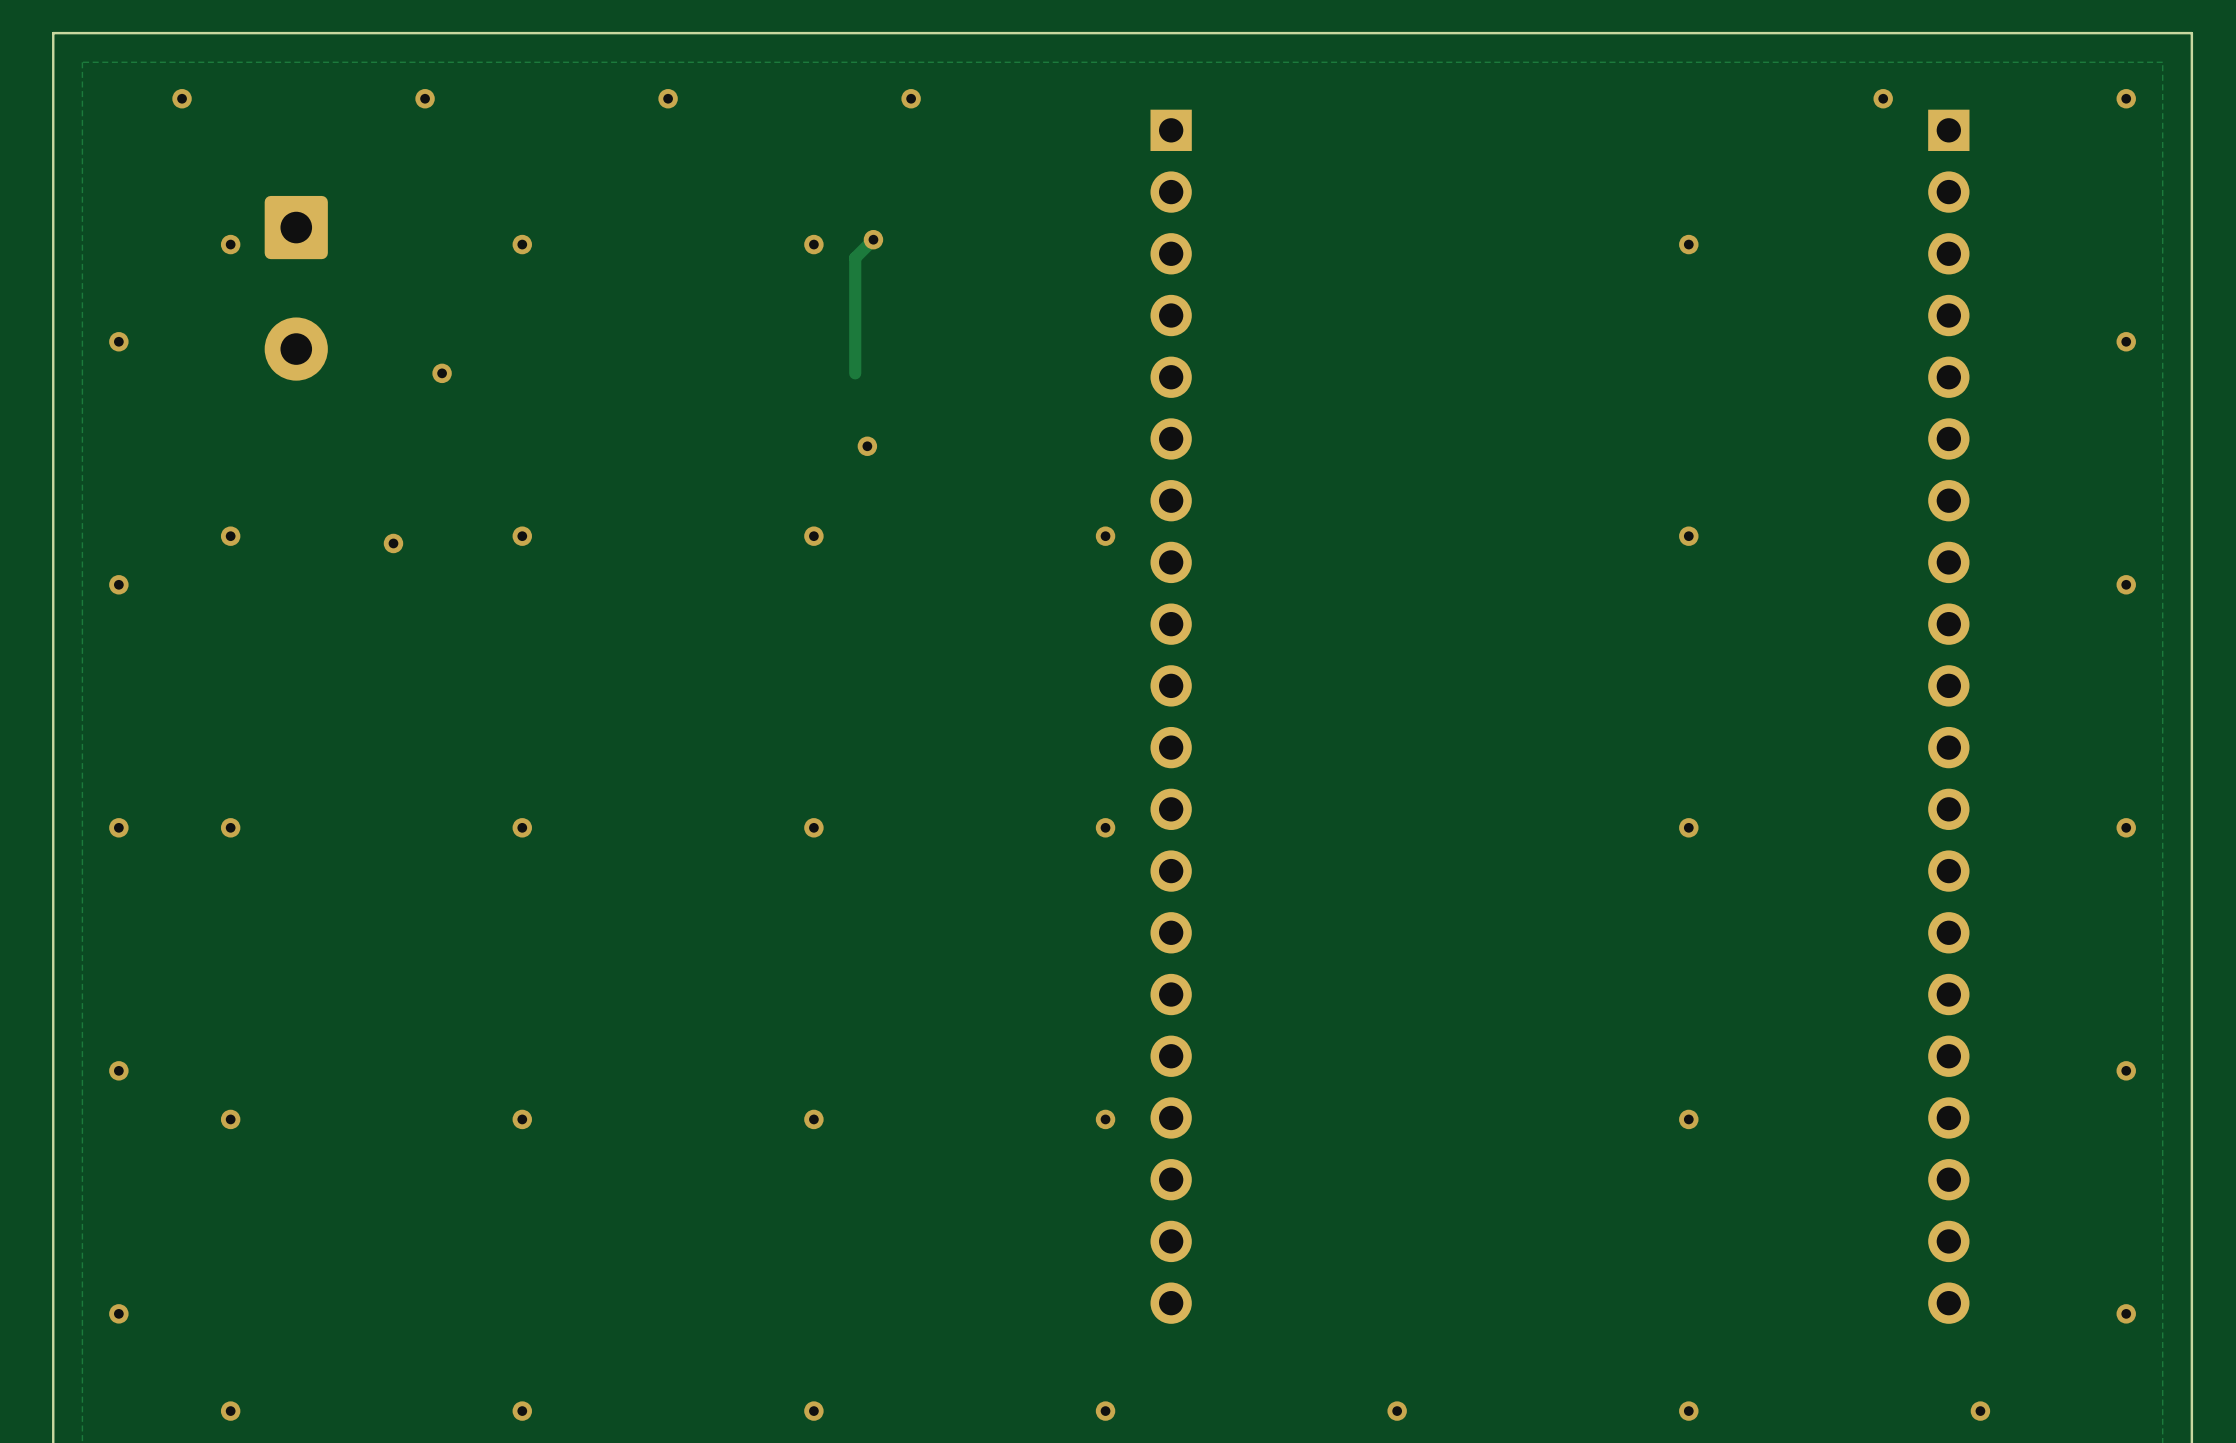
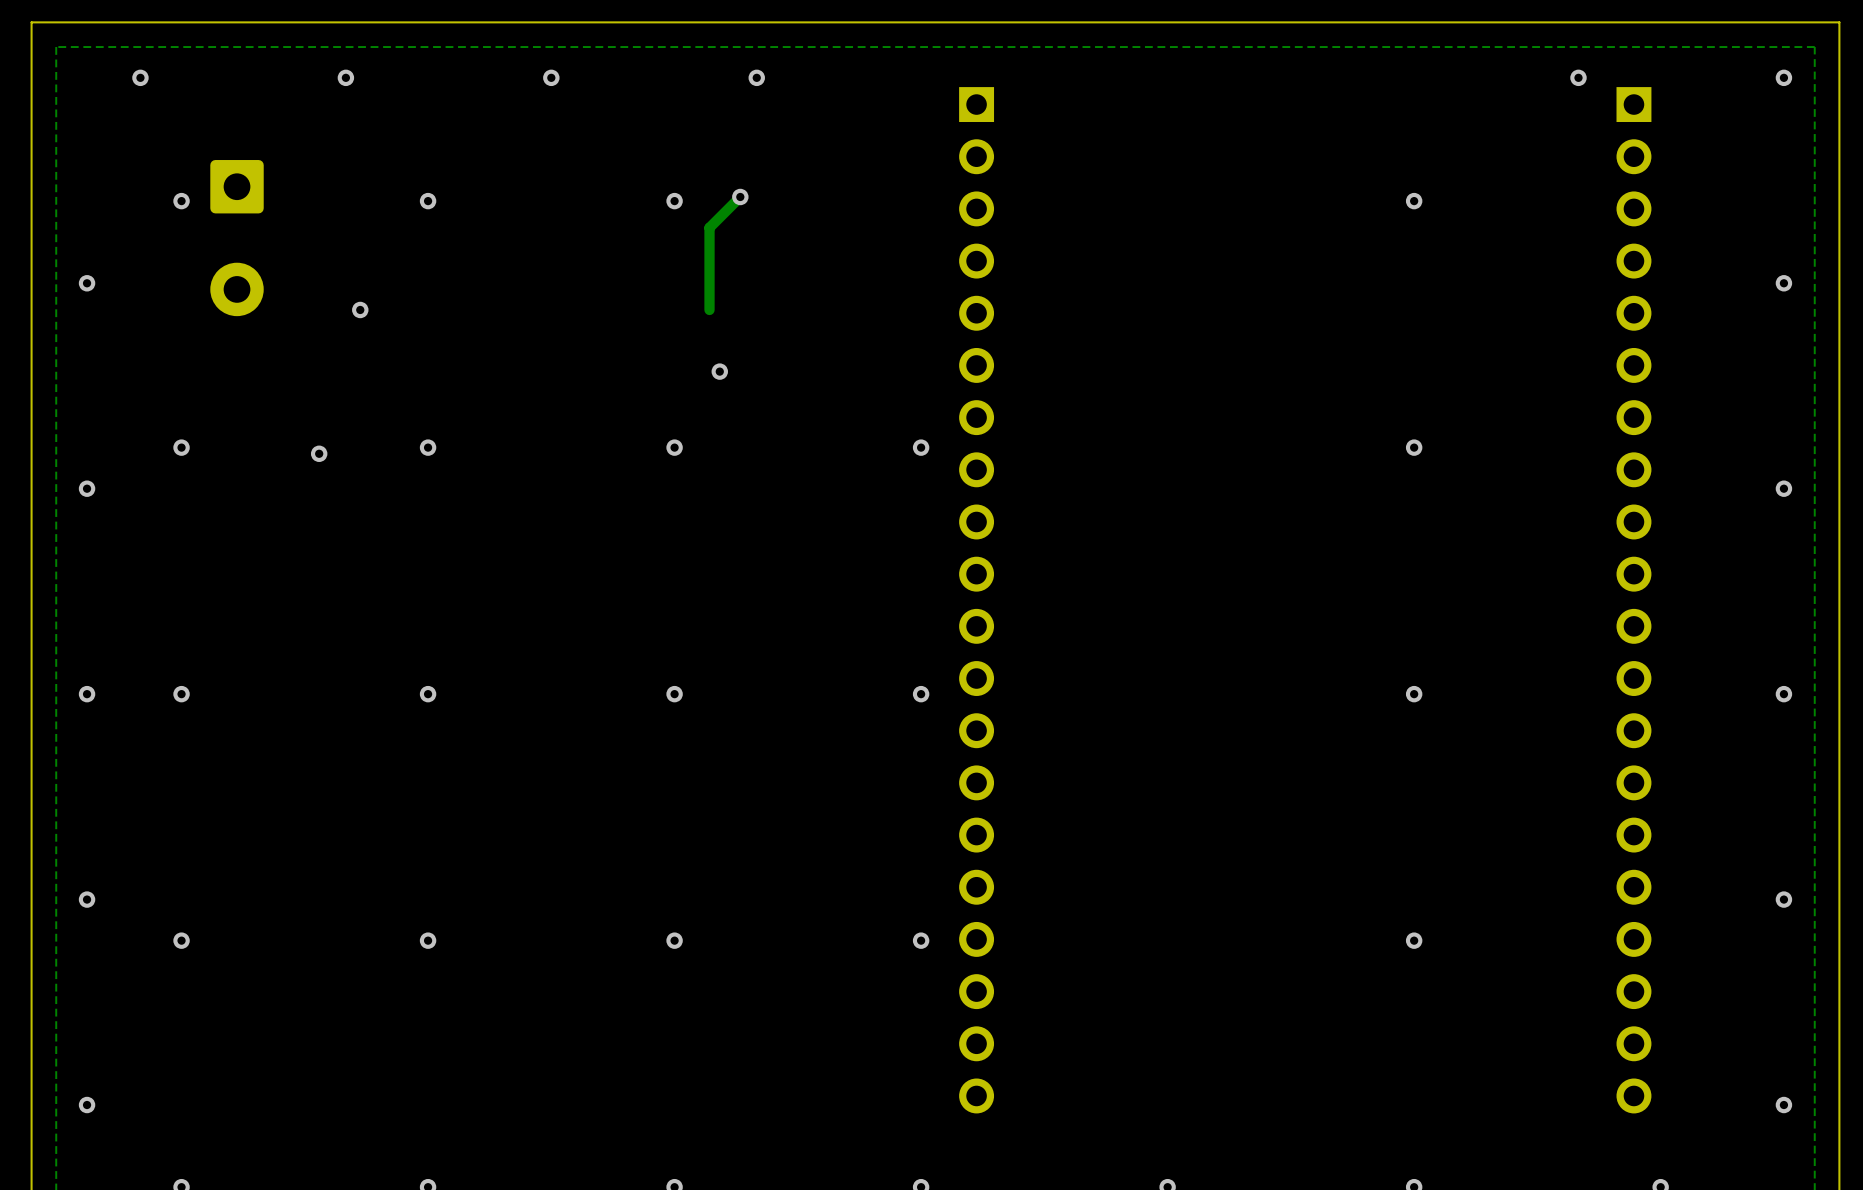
track: (873, 239) (855, 257) (855, 276) -> (740, 196) (709, 227)
via position: (873, 239) -> (740, 196)

